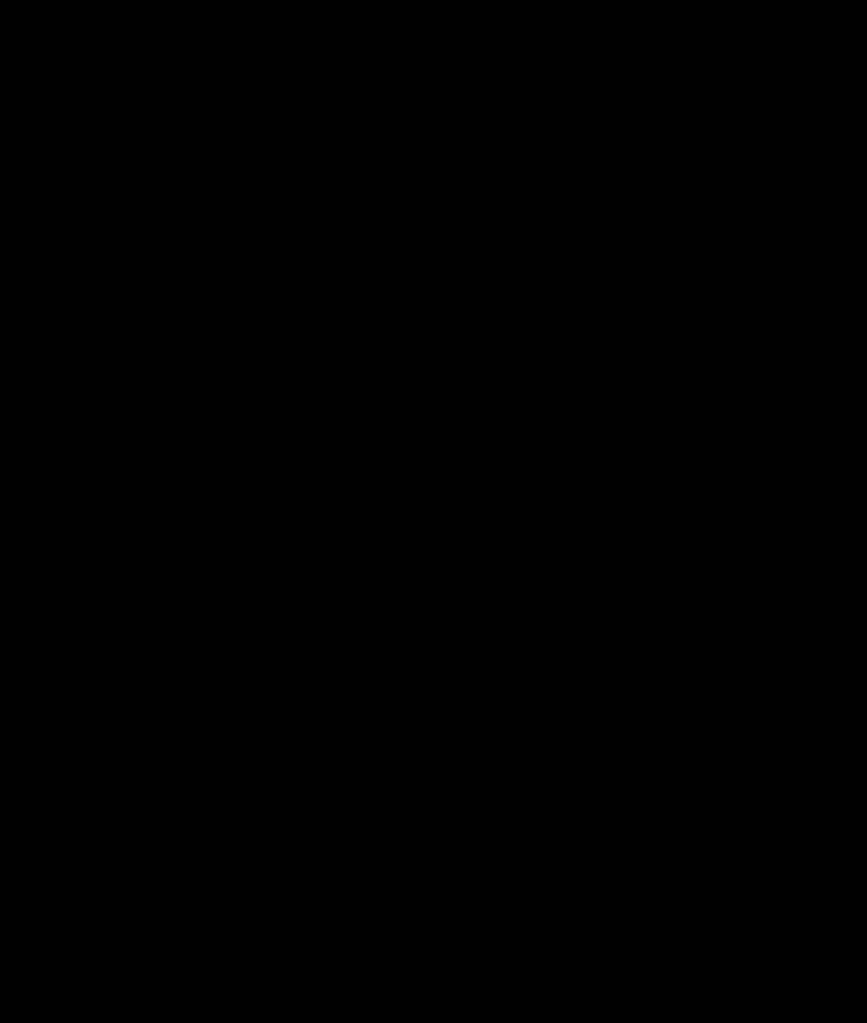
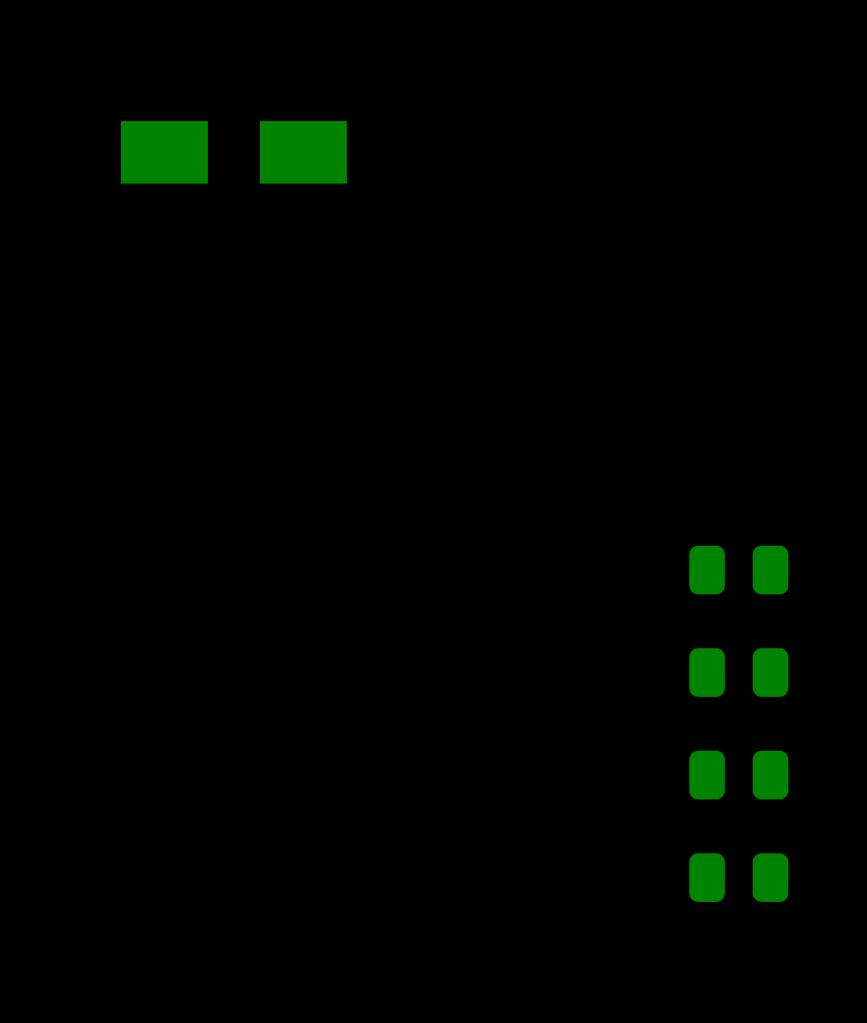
part: none -> (233, 152)
part: none -> (738, 570)
part: none -> (738, 672)
part: none -> (738, 775)
part: none -> (738, 877)

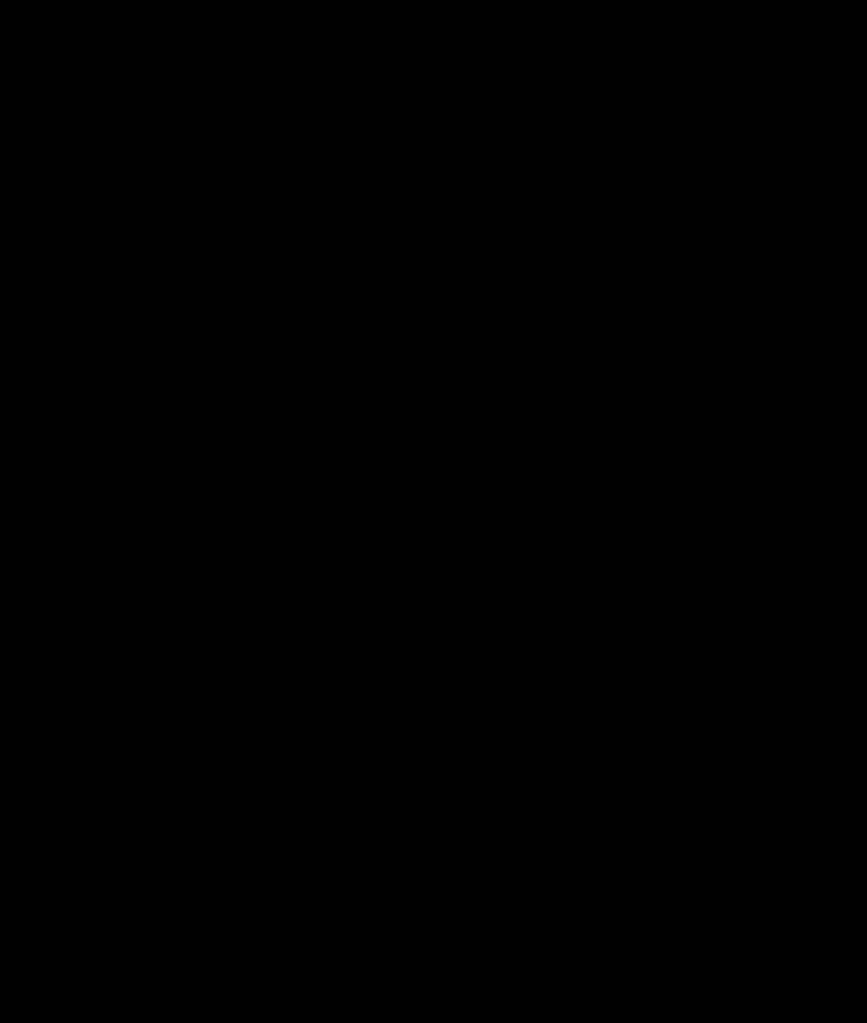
part: (233, 152) -> none
part: (738, 570) -> none
part: (738, 672) -> none
part: (738, 775) -> none
part: (738, 877) -> none

